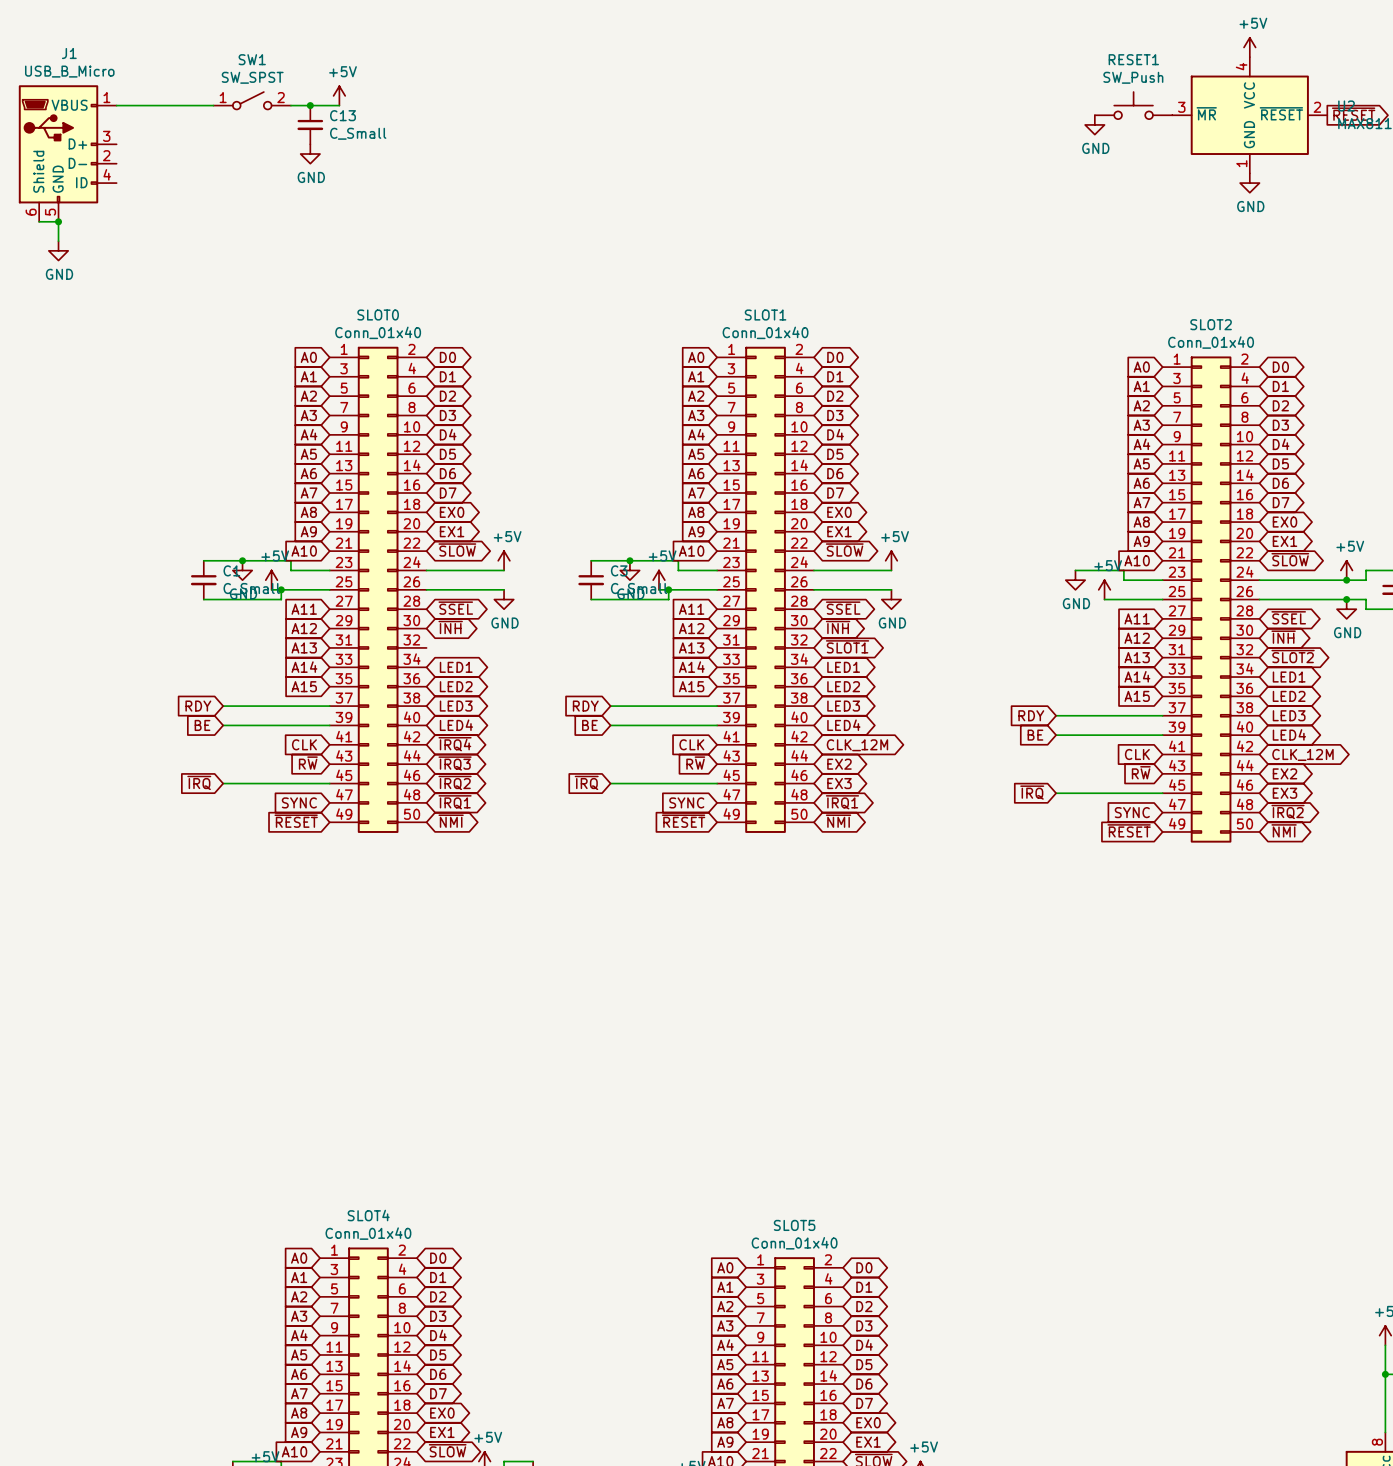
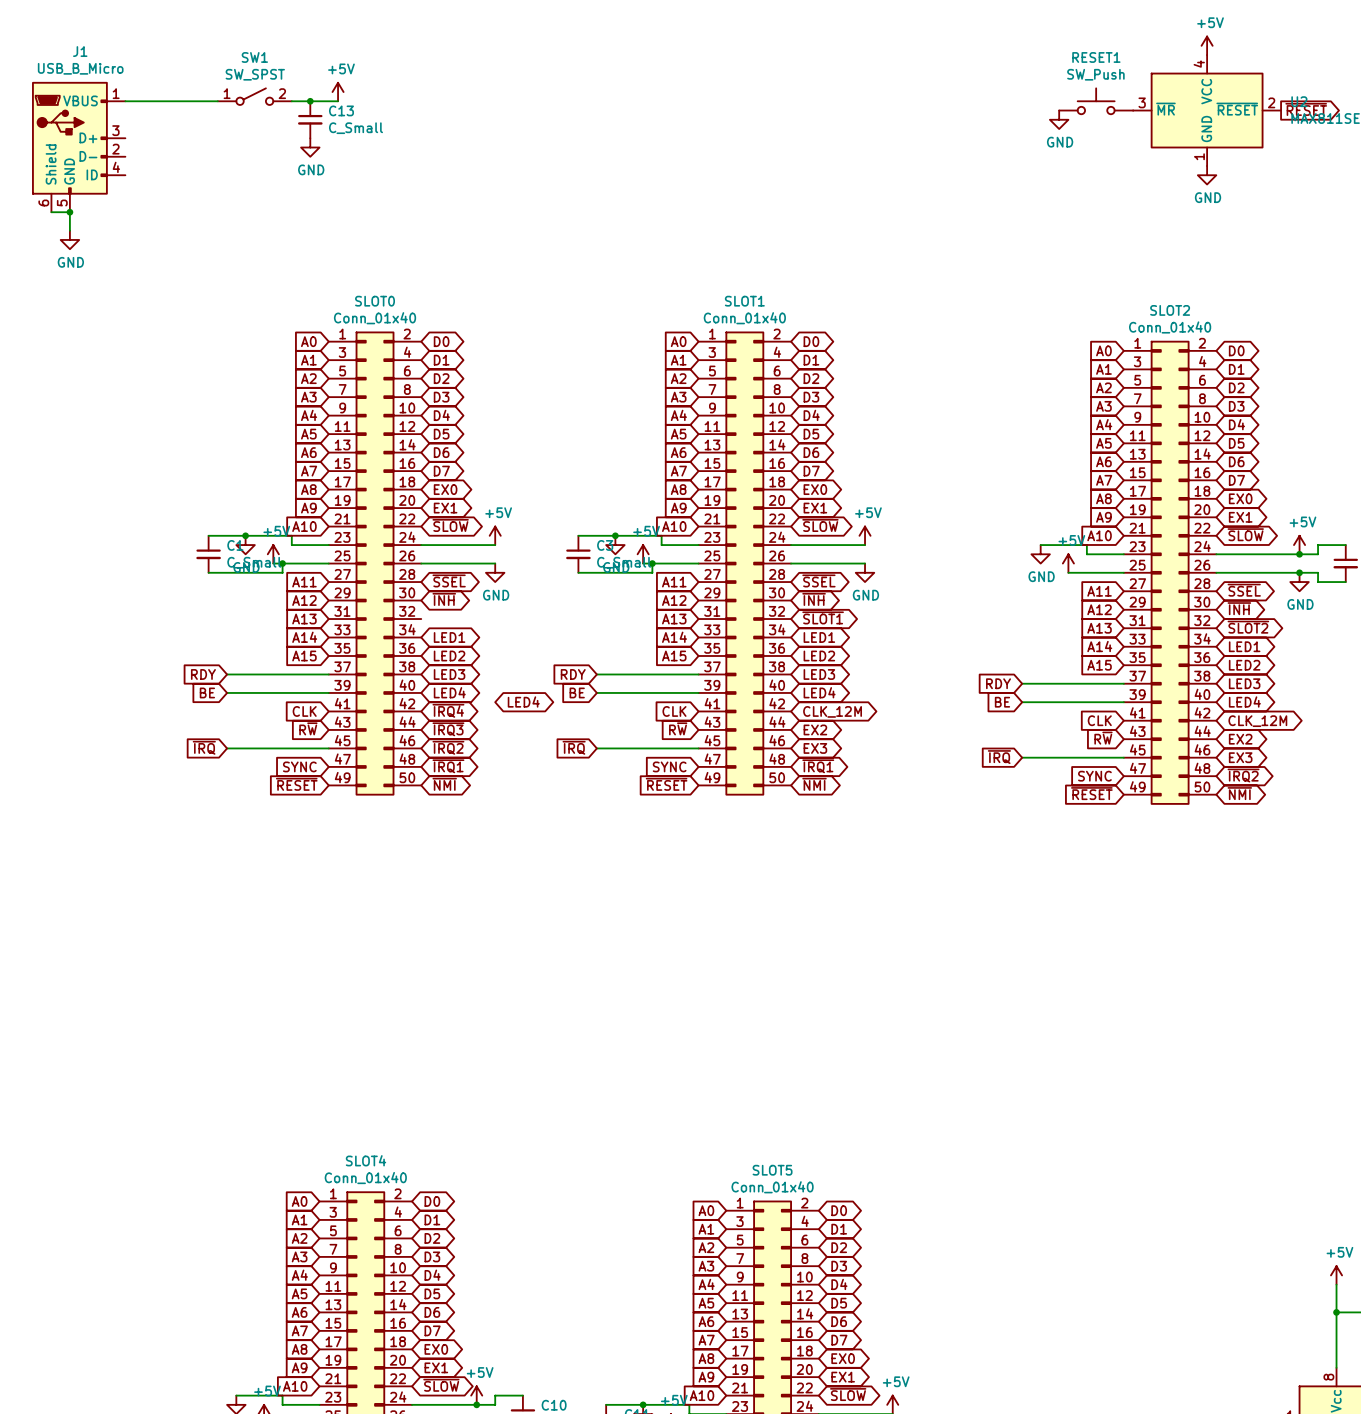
global label: none -> LED4 (523, 702)

